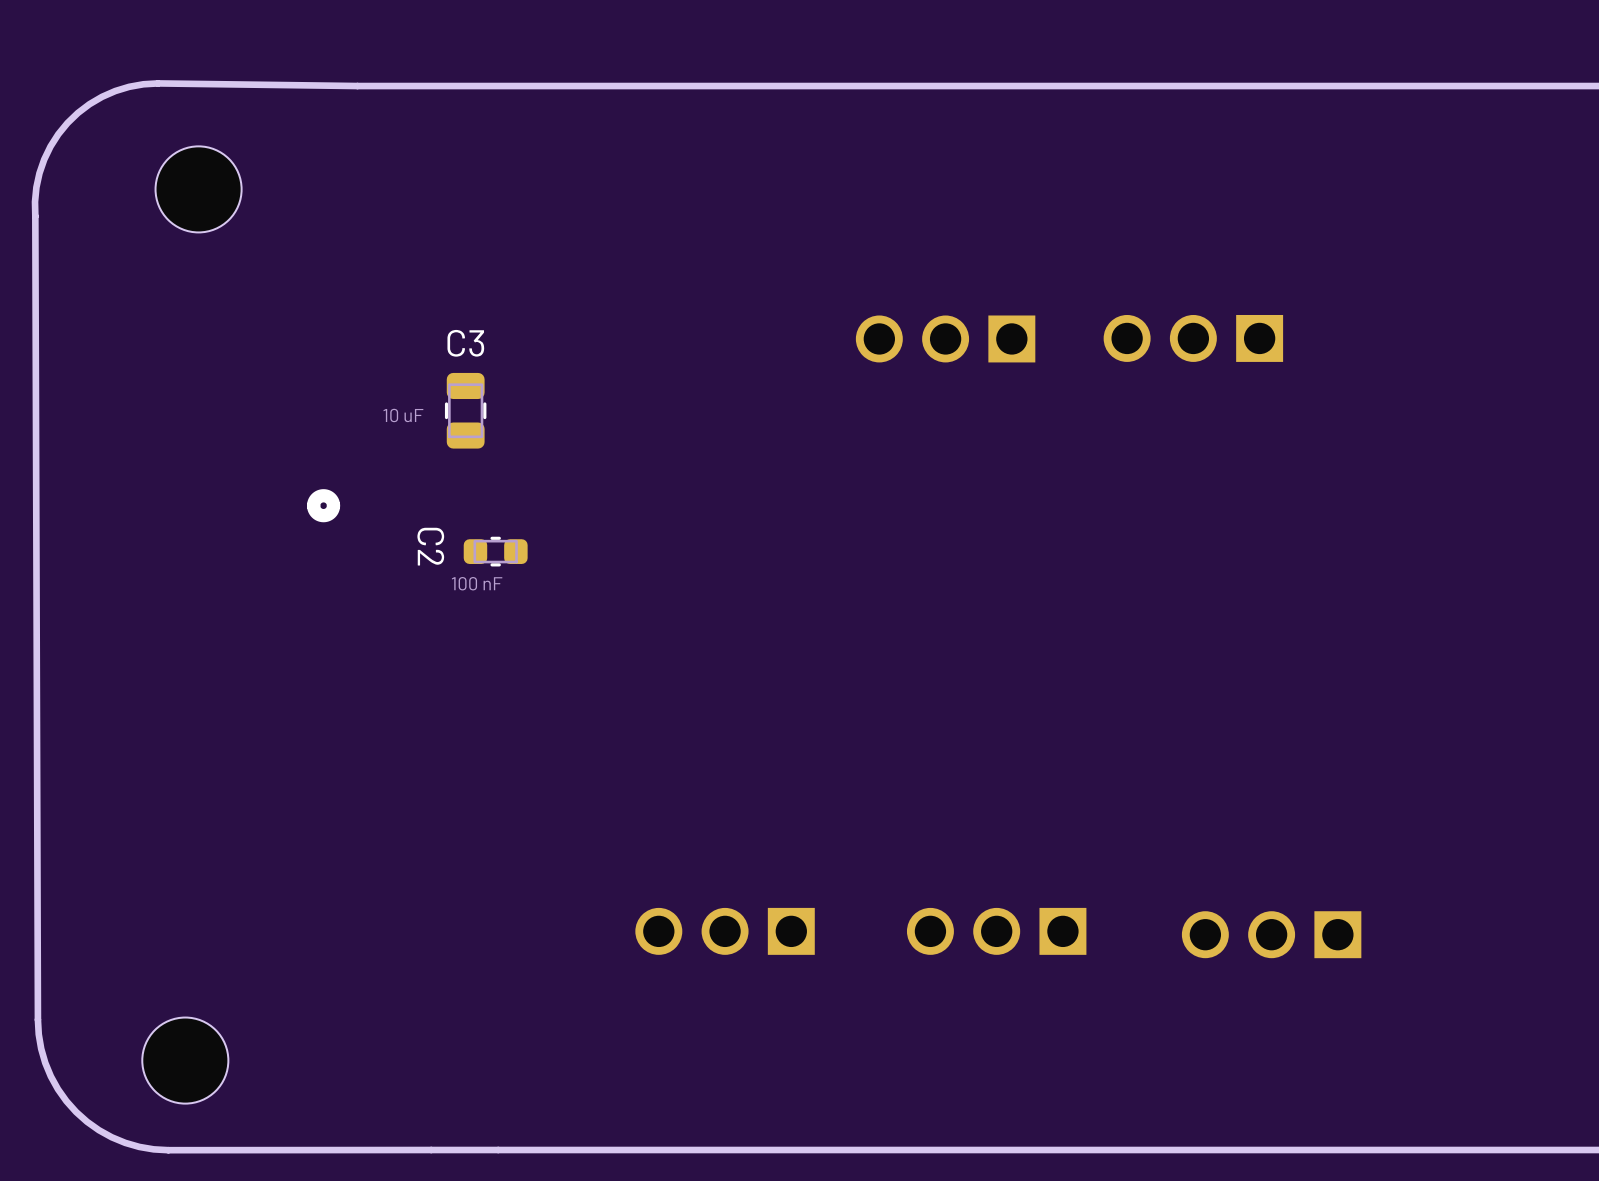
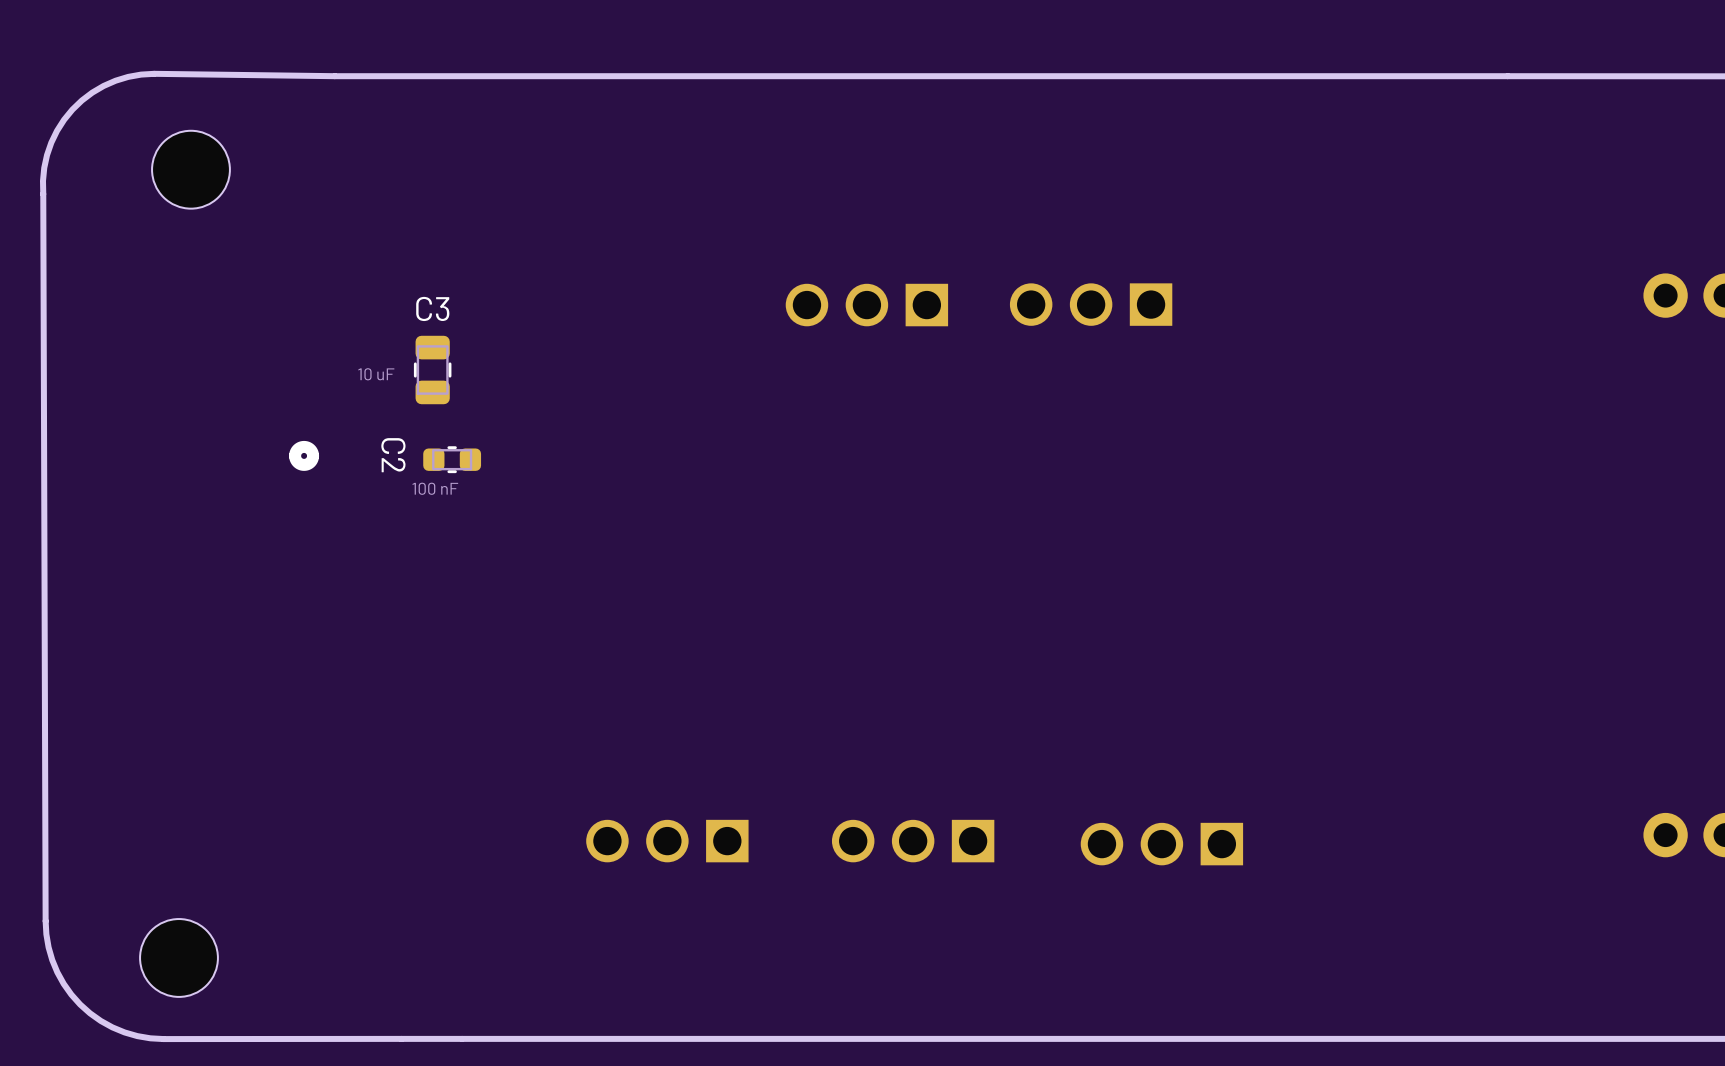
C2 position: (495, 551) -> (452, 459)

